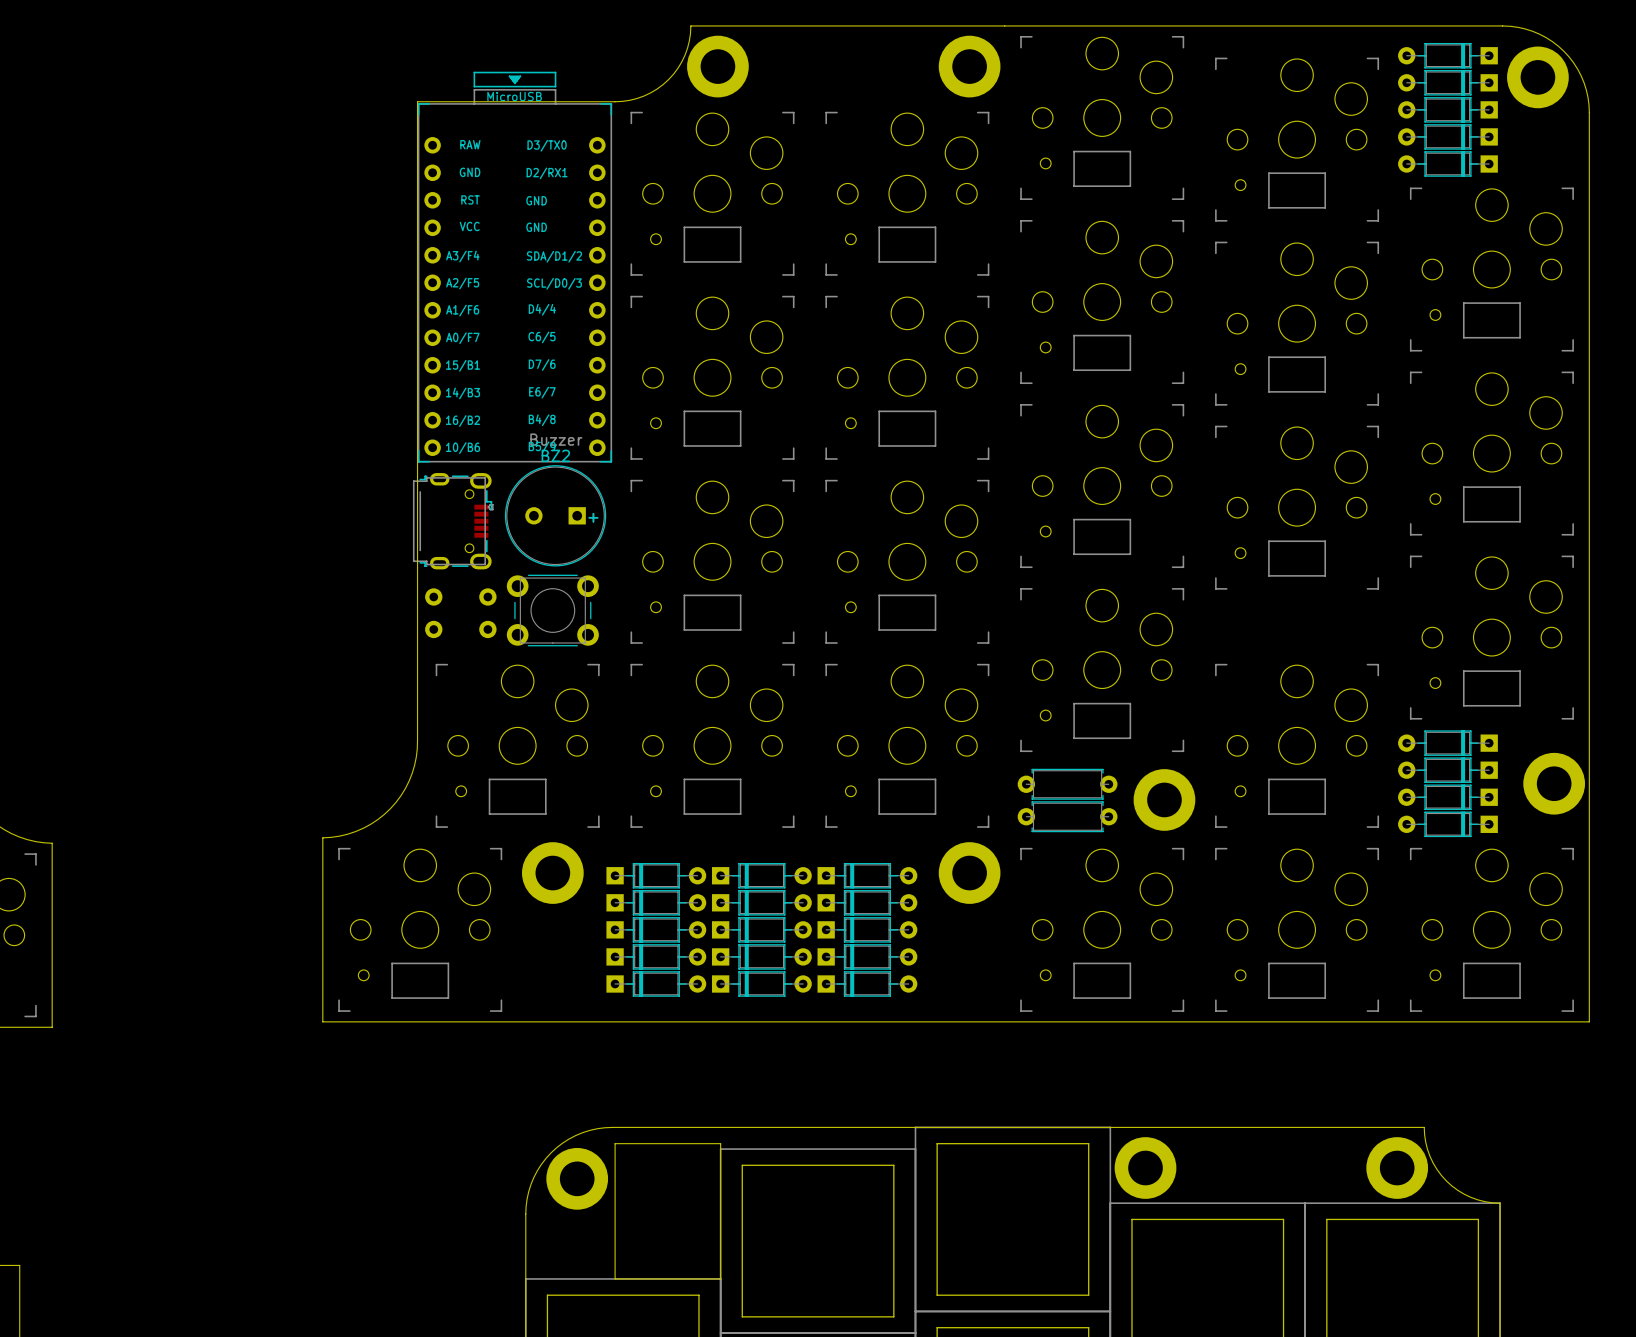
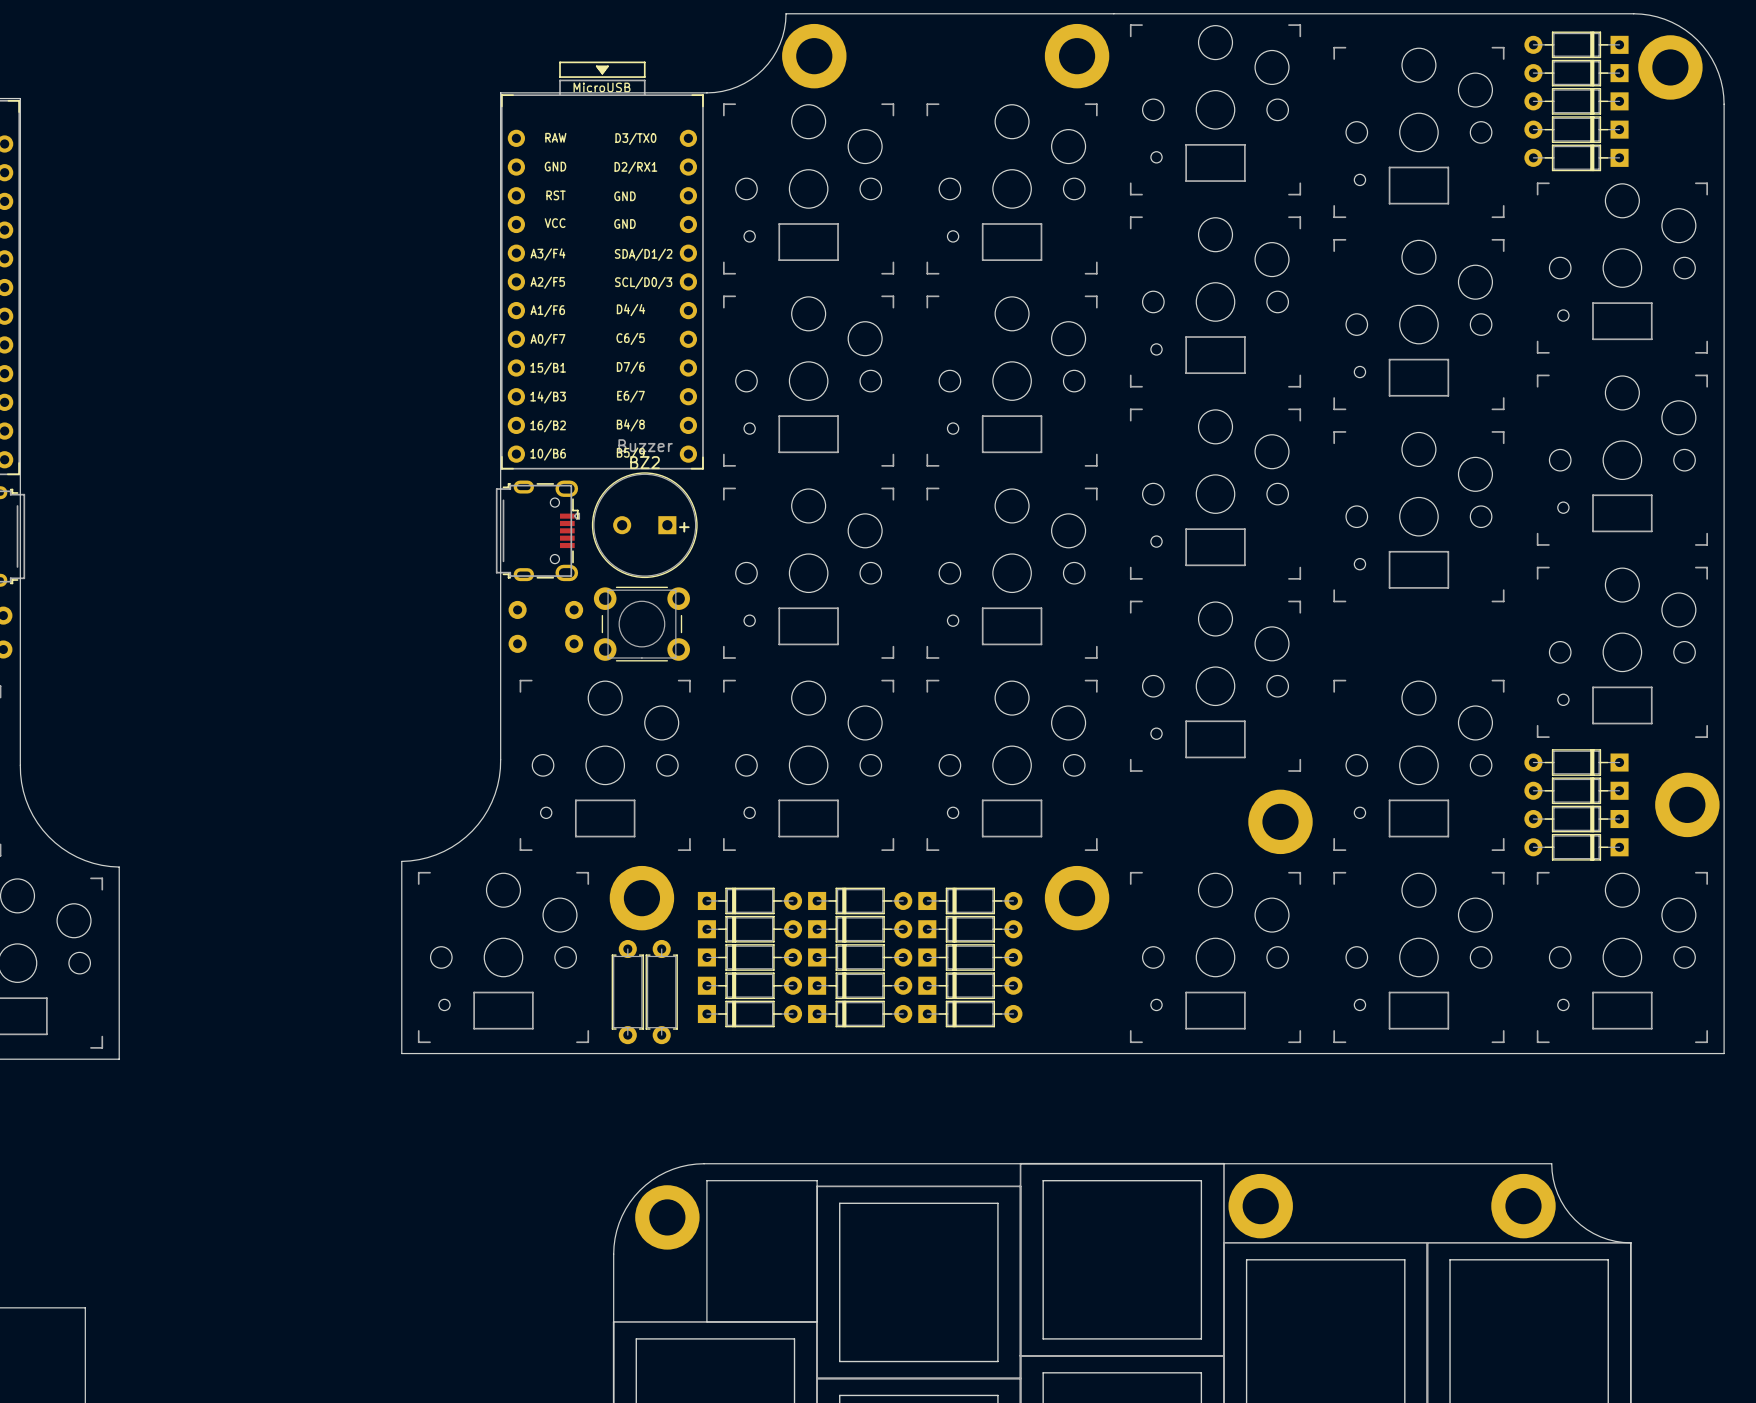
part: (1067, 784) -> none
part: (1067, 816) -> none
part: none -> (627, 992)
part: none -> (661, 992)

